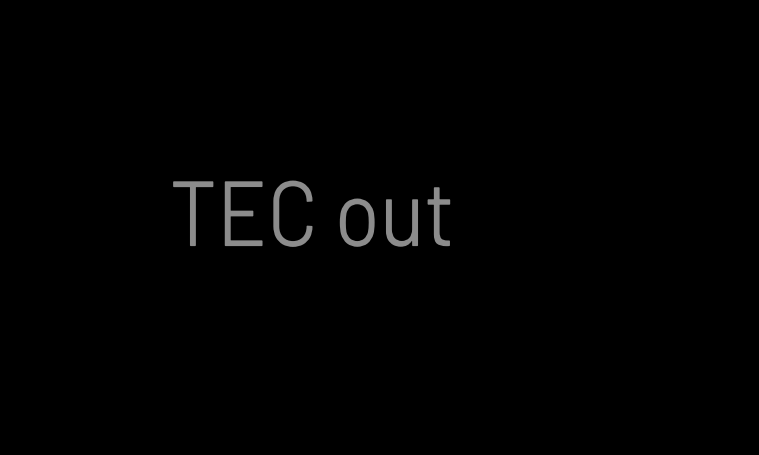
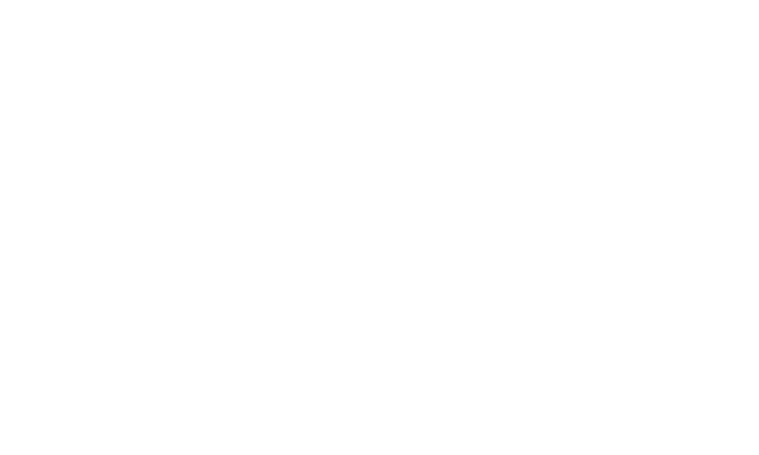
text: TEC out (311, 213) -> none

